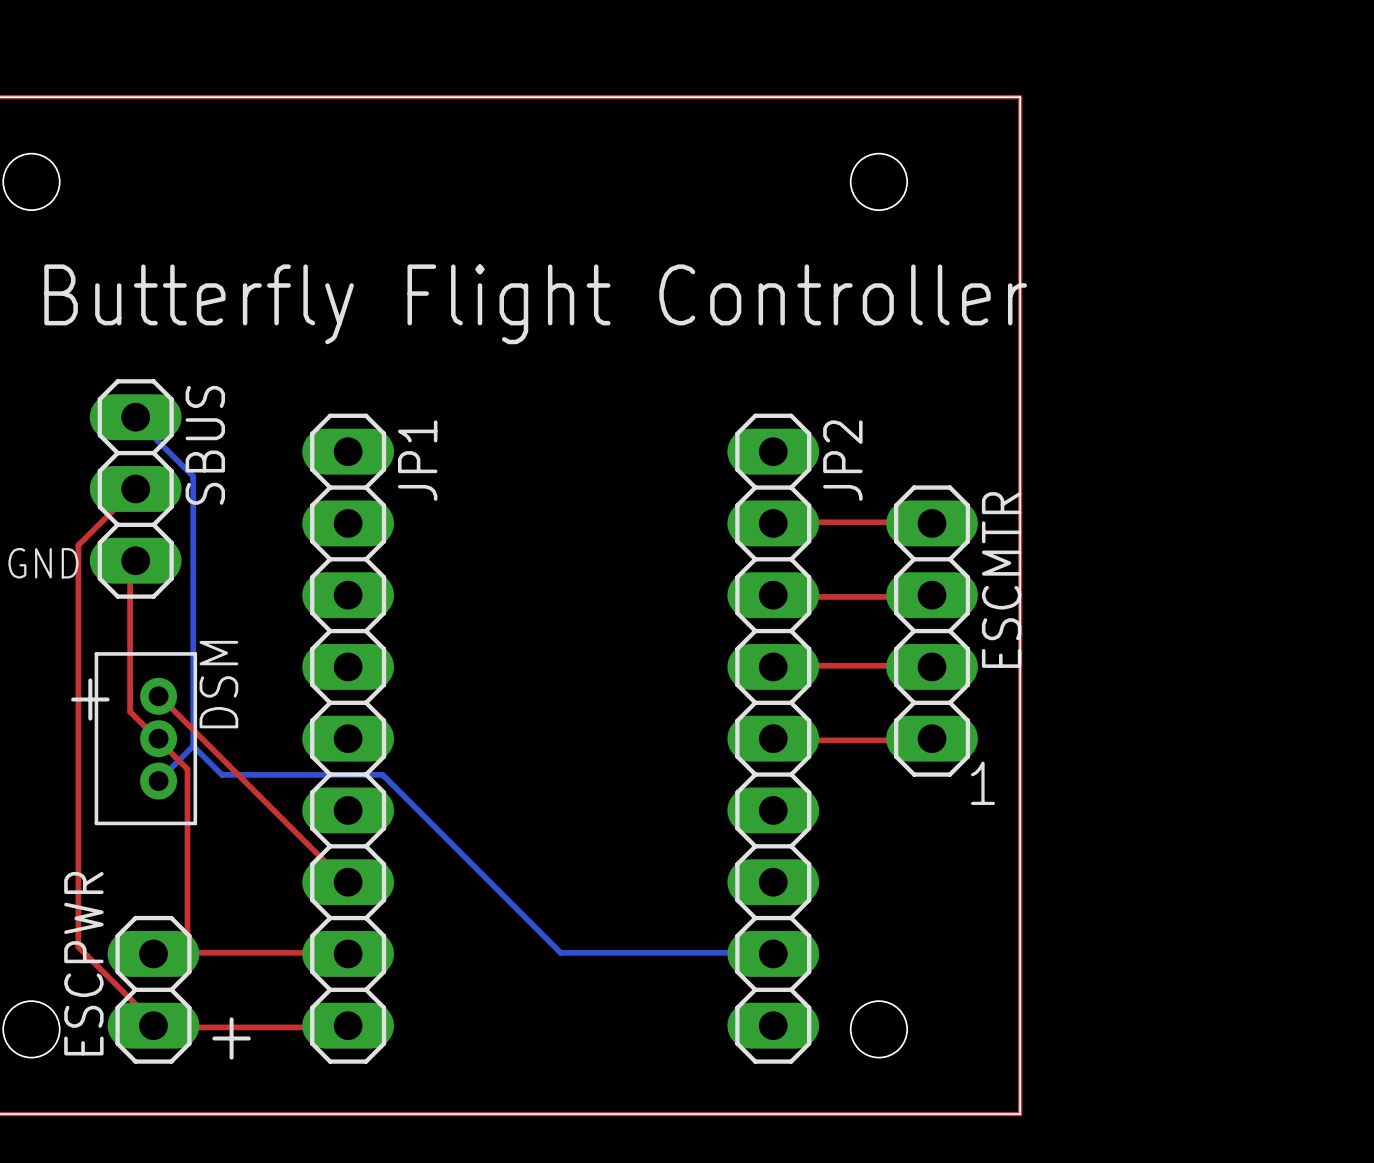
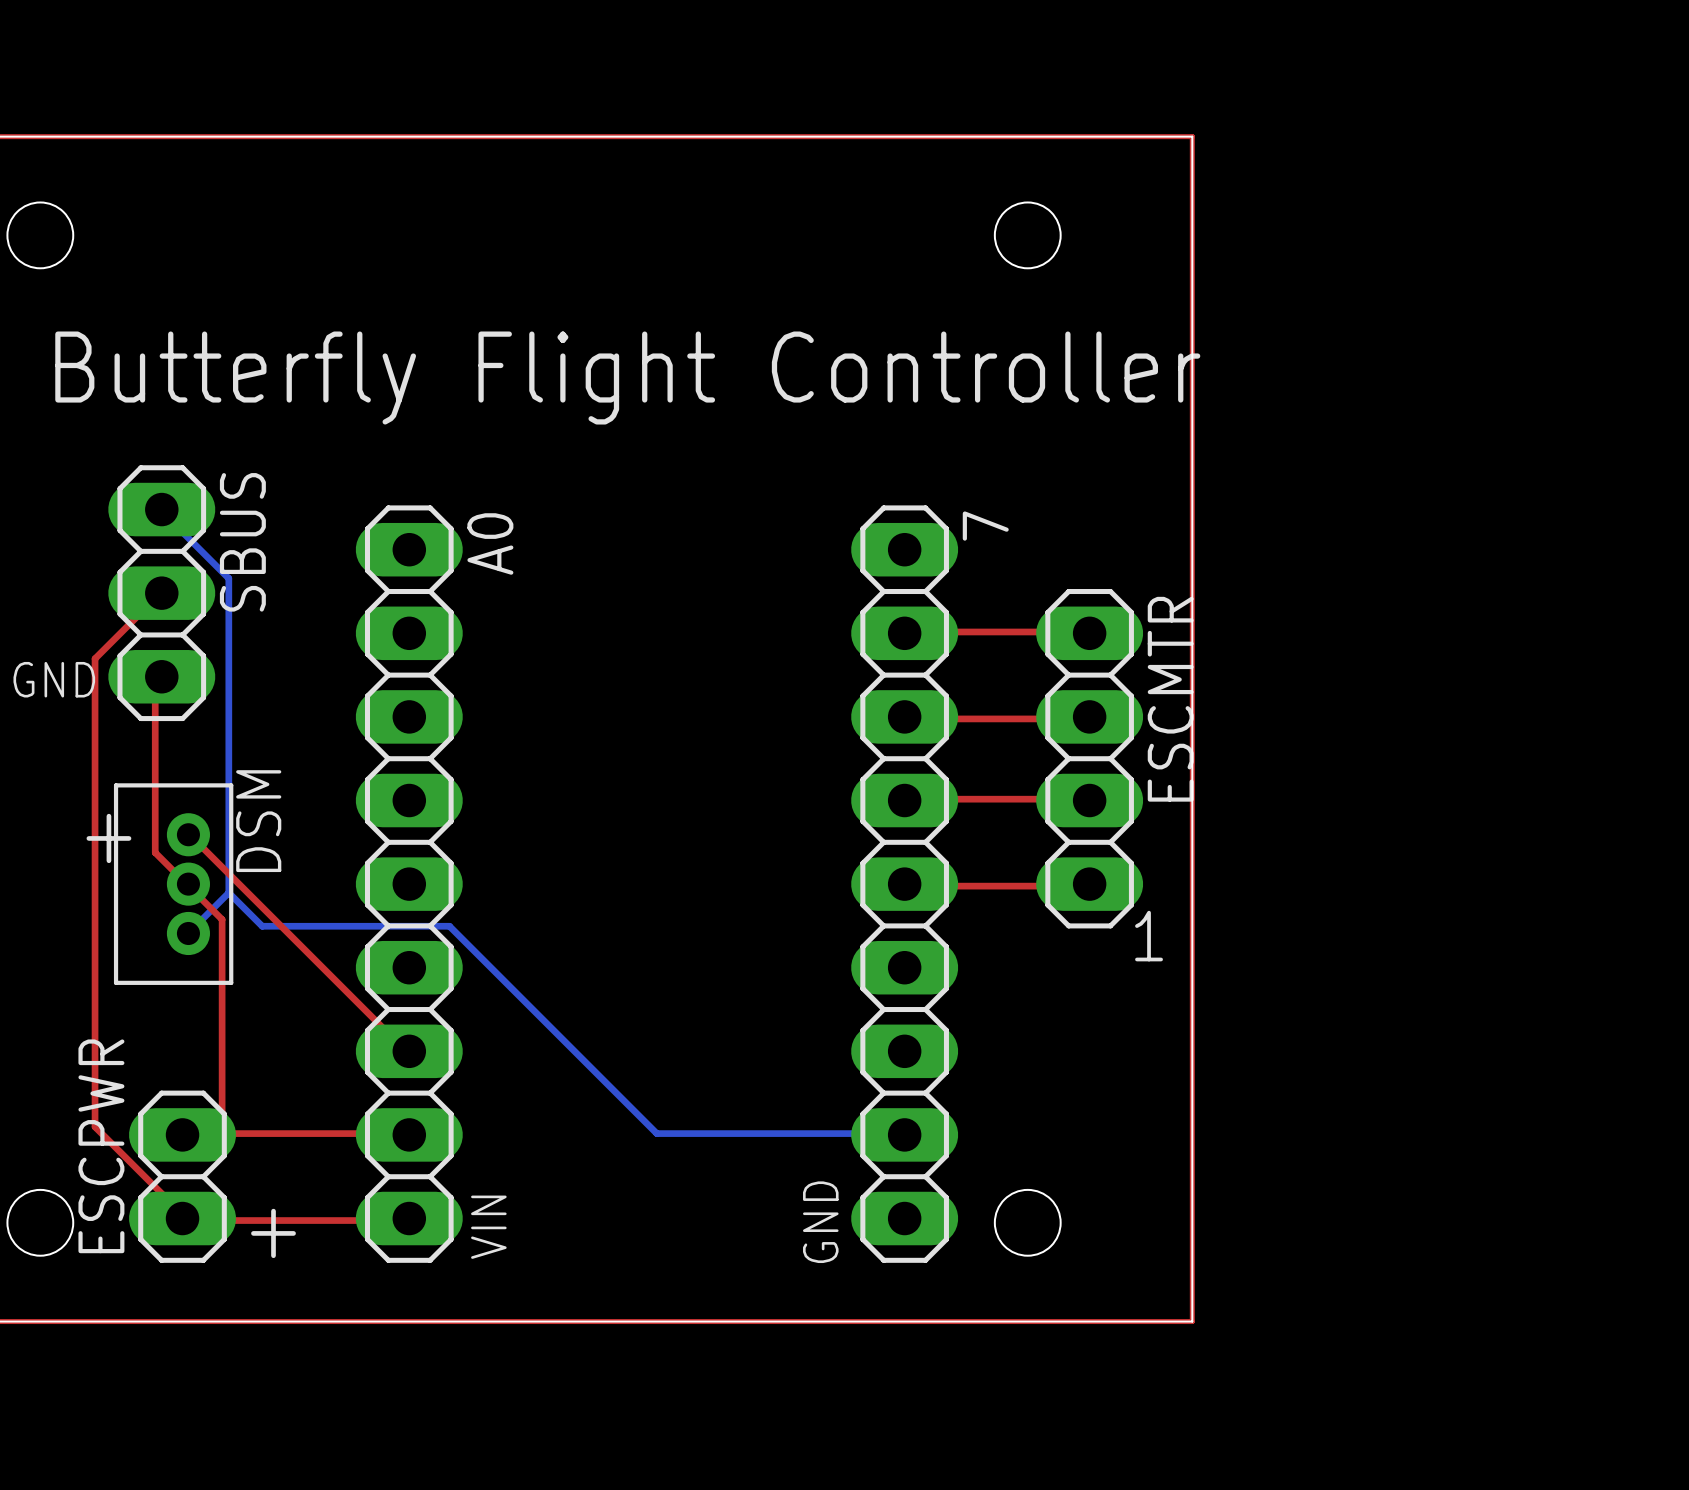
JP1 name: JP1 (417, 460) -> A0 (490, 543)
JP2 name: JP2 (842, 460) -> 7 (985, 526)
text: none -> GND (820, 1222)
text: none -> VIN (488, 1227)

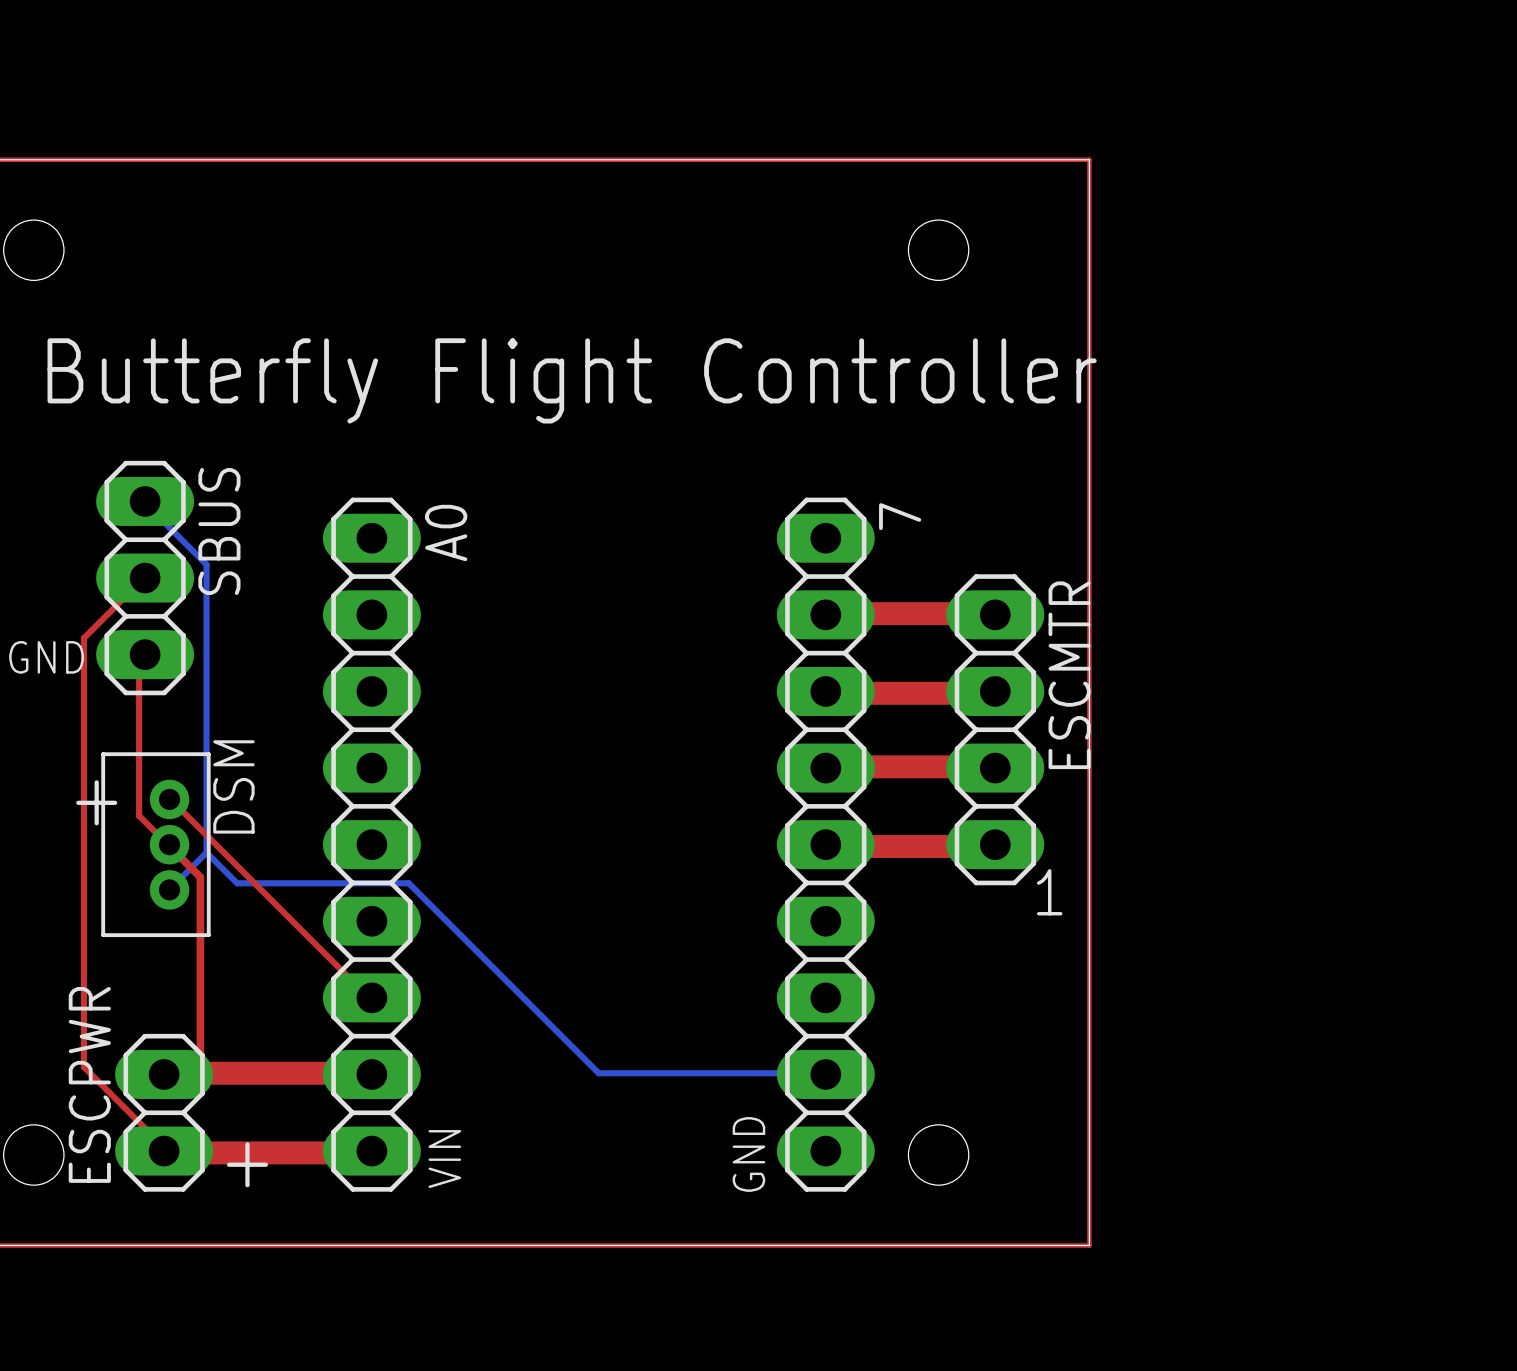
top track width: thin (911, 631) (1084, 631) -> thick (831, 613) (990, 613)
top track width: thin (911, 718) (1084, 718) -> thick (831, 693) (990, 693)
top track width: thin (911, 799) (1084, 799) -> thick (831, 766) (990, 766)
top track width: thin (188, 886) (222, 919) (222, 1133) (402, 1133) -> thick (169, 846) (200, 877) (200, 1073) (365, 1073)
top track width: thin (911, 886) (1084, 886) -> thick (831, 846) (990, 846)
top track width: thin (188, 1220) (402, 1220) -> thick (169, 1152) (365, 1152)

